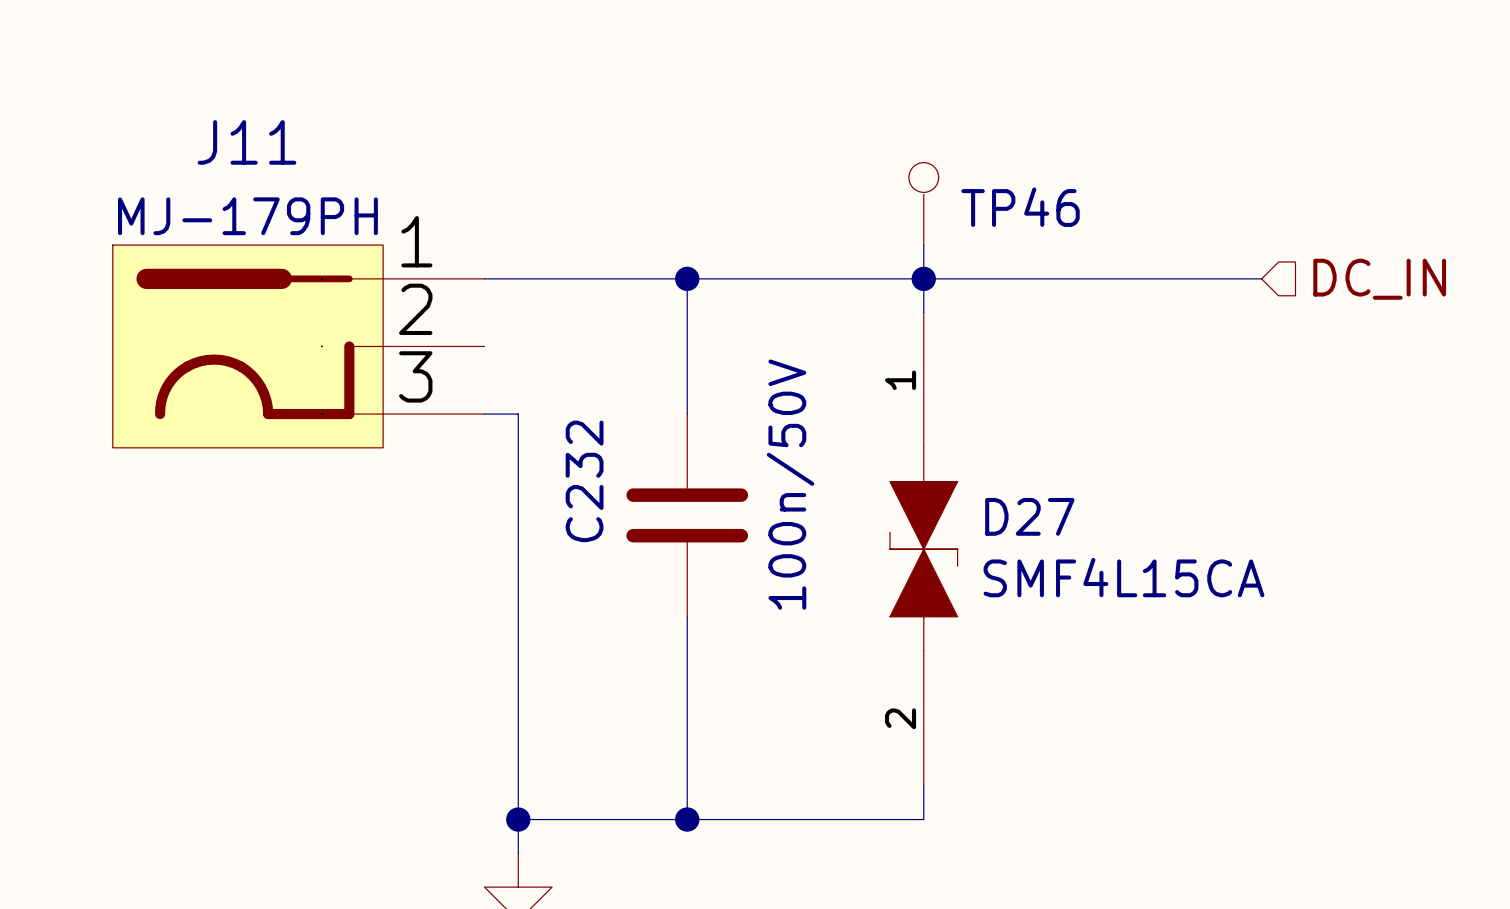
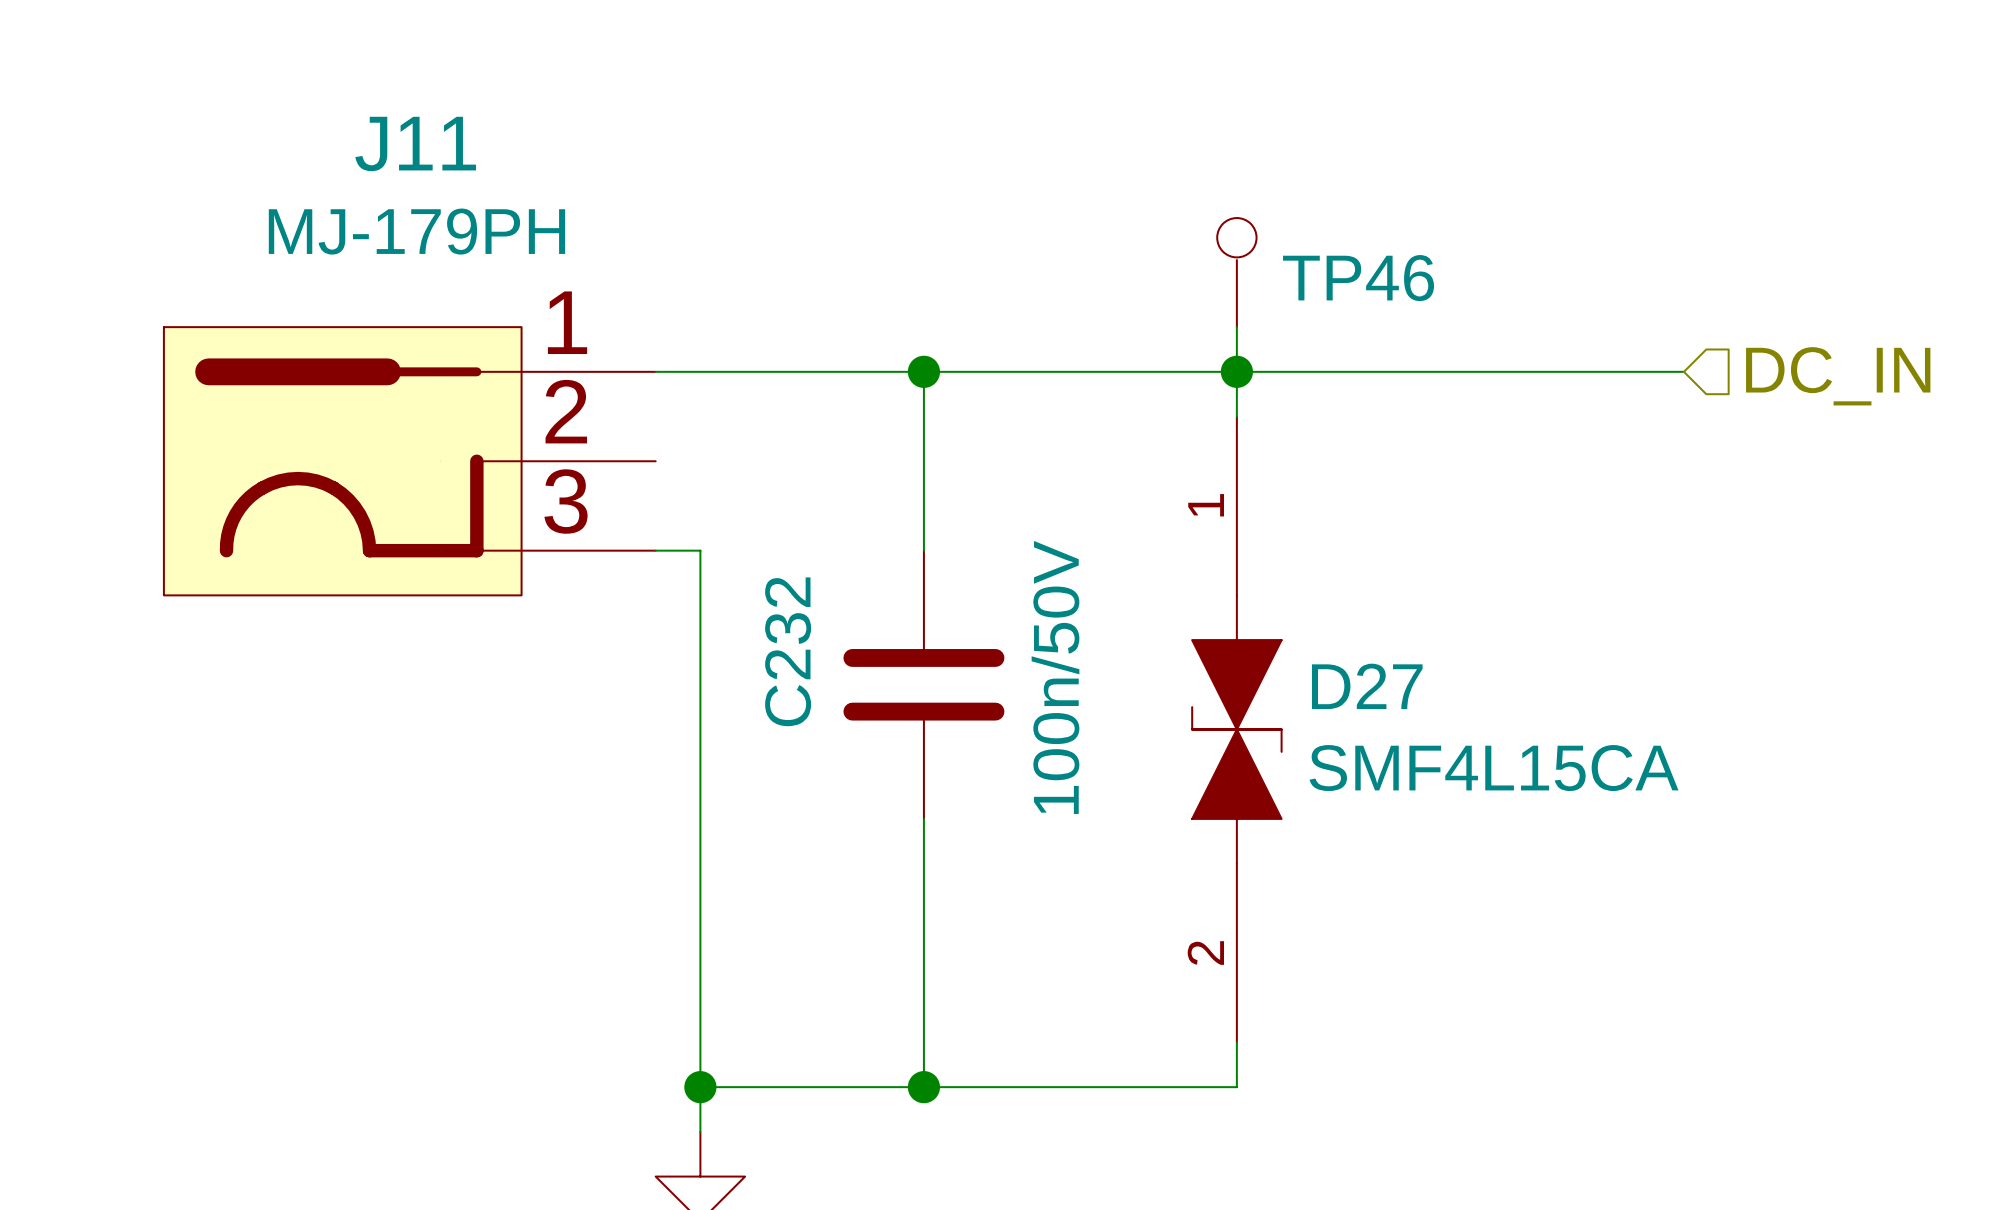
J11 name position: J11 (246, 142) -> J11 (415, 144)
J11 text position: MJ-179PH (247, 216) -> MJ-179PH (416, 231)

